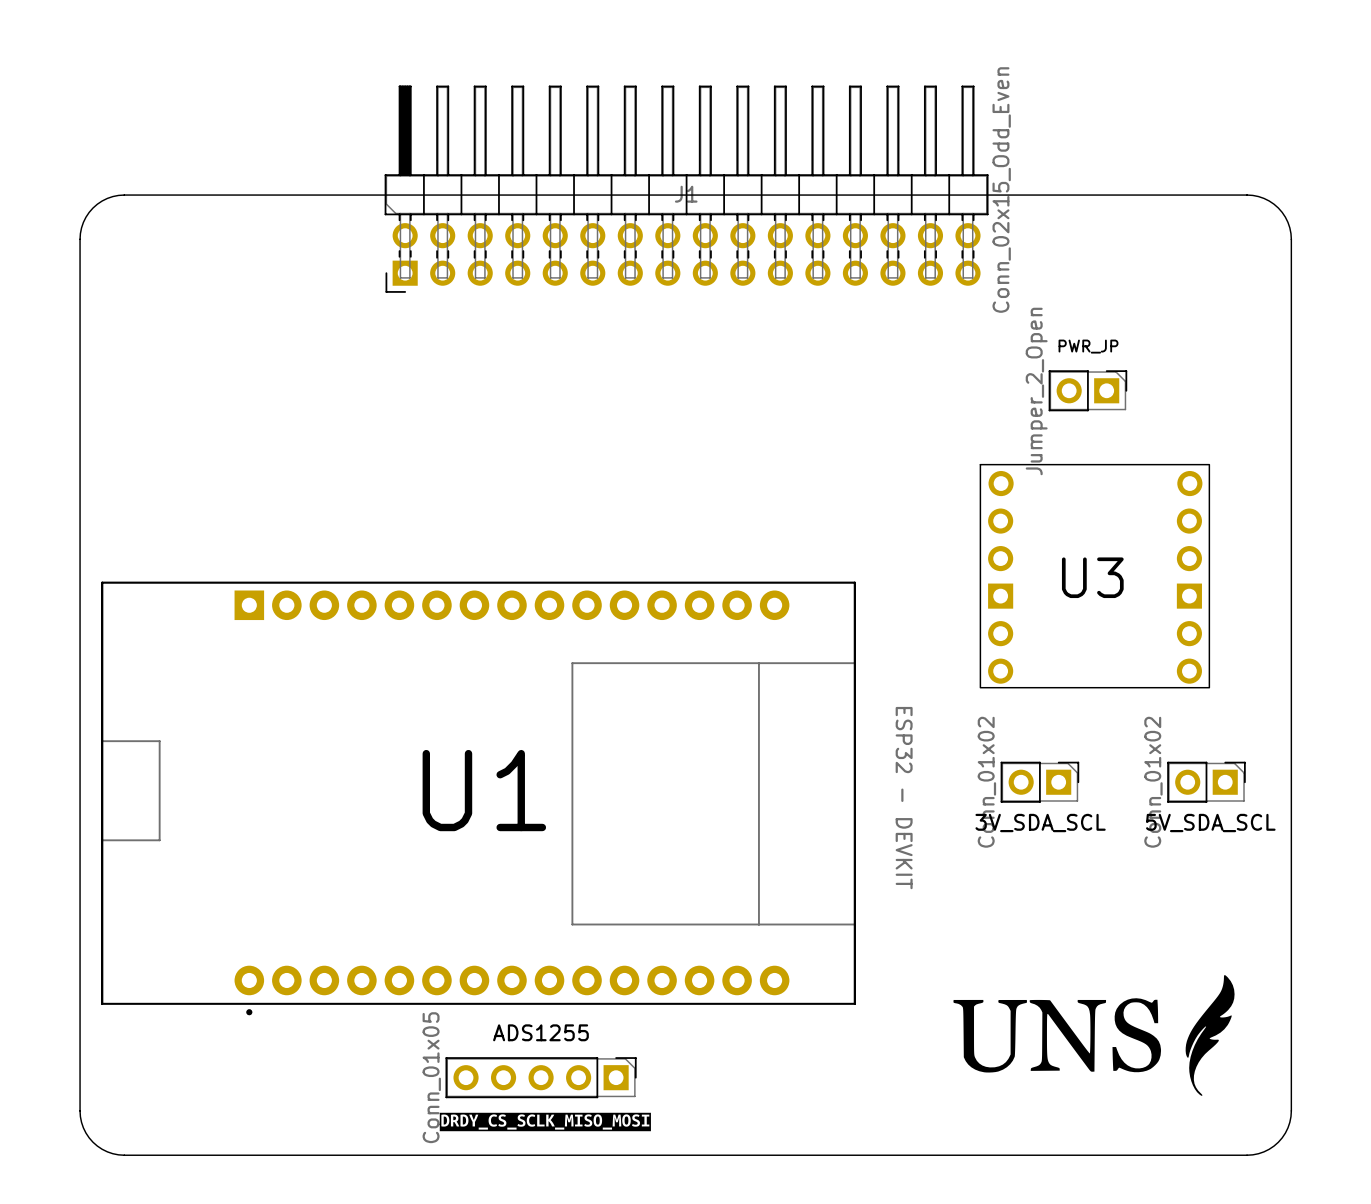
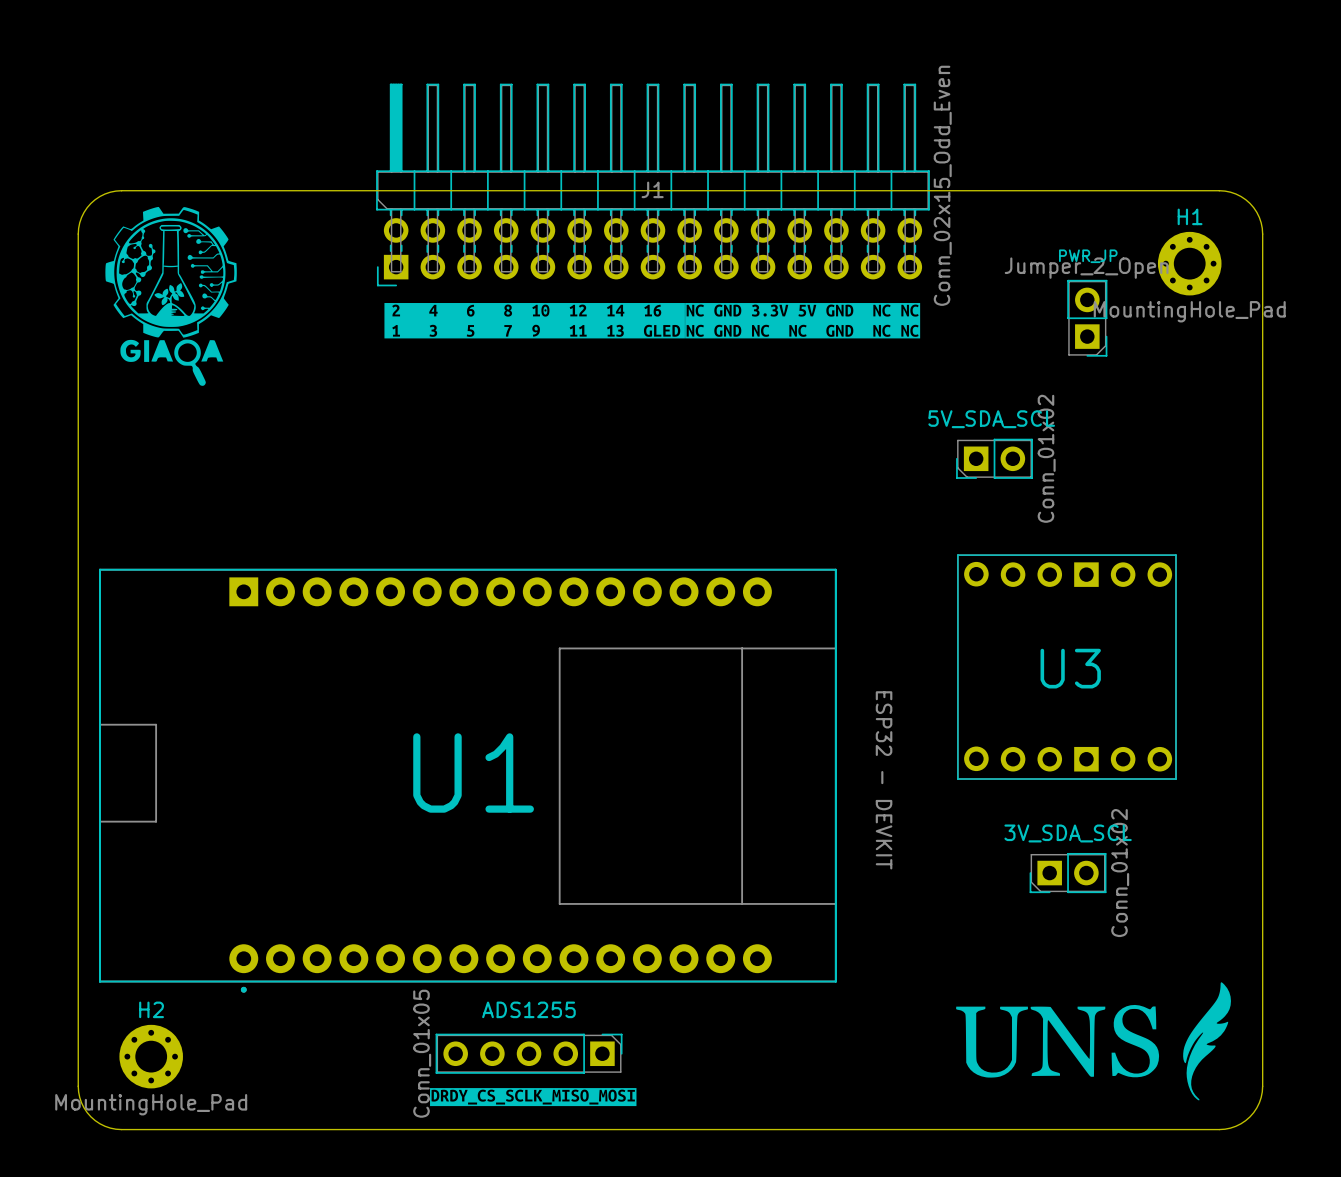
J1 footprint: [384, 85, 989, 293] -> [376, 83, 930, 287]
drawing: none -> [105, 206, 237, 386]
H1: none -> MountingHole_Pad (1189, 263)
drawing: none -> [384, 303, 921, 339]
PWR_JP rotation: 0° (1087, 390) -> 90° clockwise (1087, 318)
PWR_JP position: (1087, 390) -> (1087, 318)
U3 footprint: [979, 463, 1211, 689] -> [957, 554, 1177, 780]
3V_SDA_SCL rotation: 0° (1039, 782) -> 180° (1068, 873)
3V_SDA_SCL position: (1039, 782) -> (1068, 873)
5V_SDA_SCL rotation: 0° (1206, 782) -> 180° (994, 458)
5V_SDA_SCL position: (1206, 782) -> (994, 458)
drawing position: (1094, 1035) -> (1093, 1041)
H2: none -> MountingHole_Pad (151, 1056)

